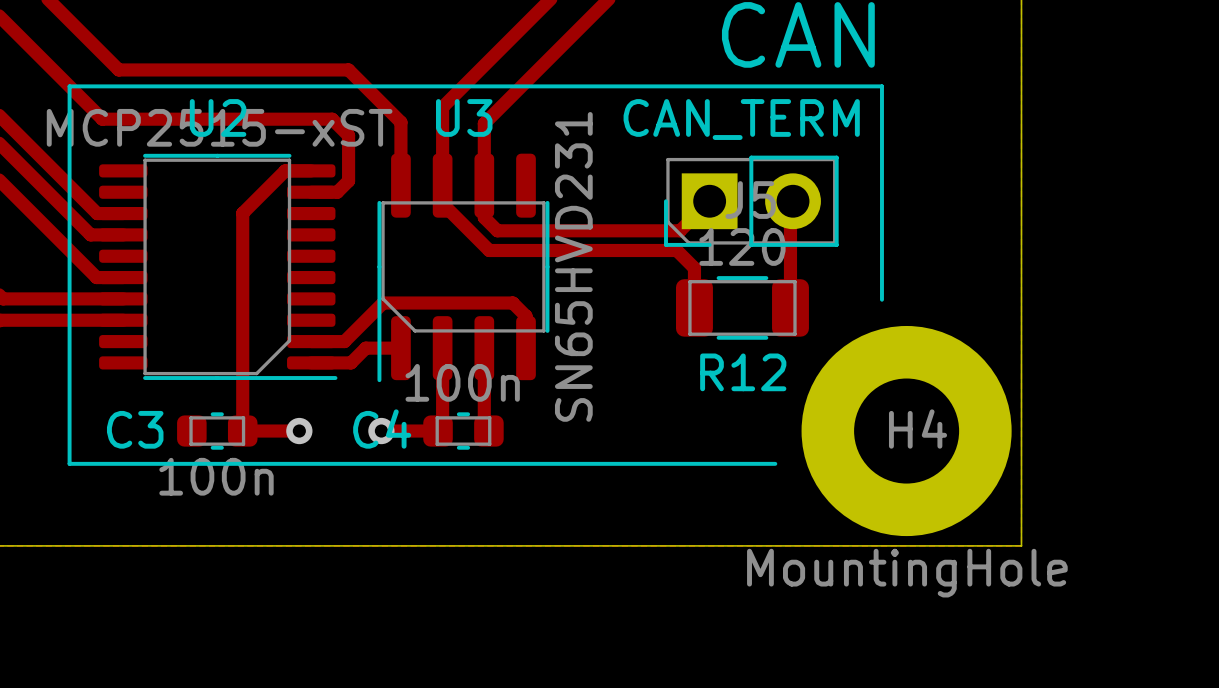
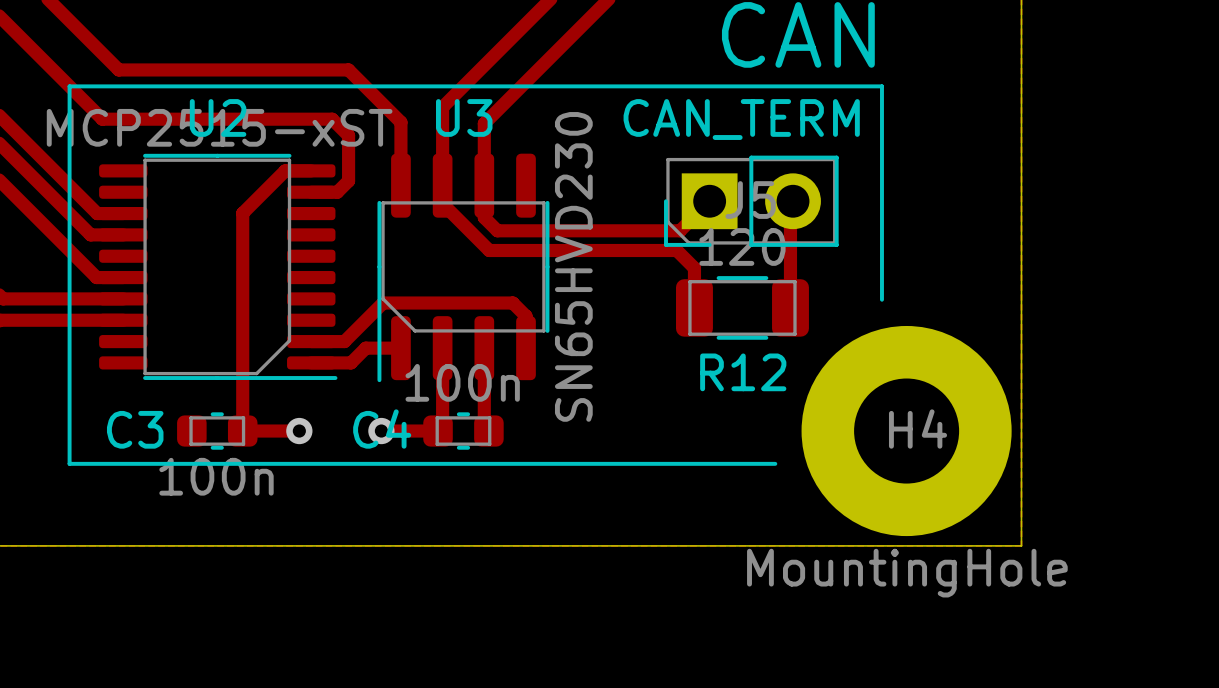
U3 value: SN65HVD231 (573, 266) -> SN65HVD230 (573, 266)

